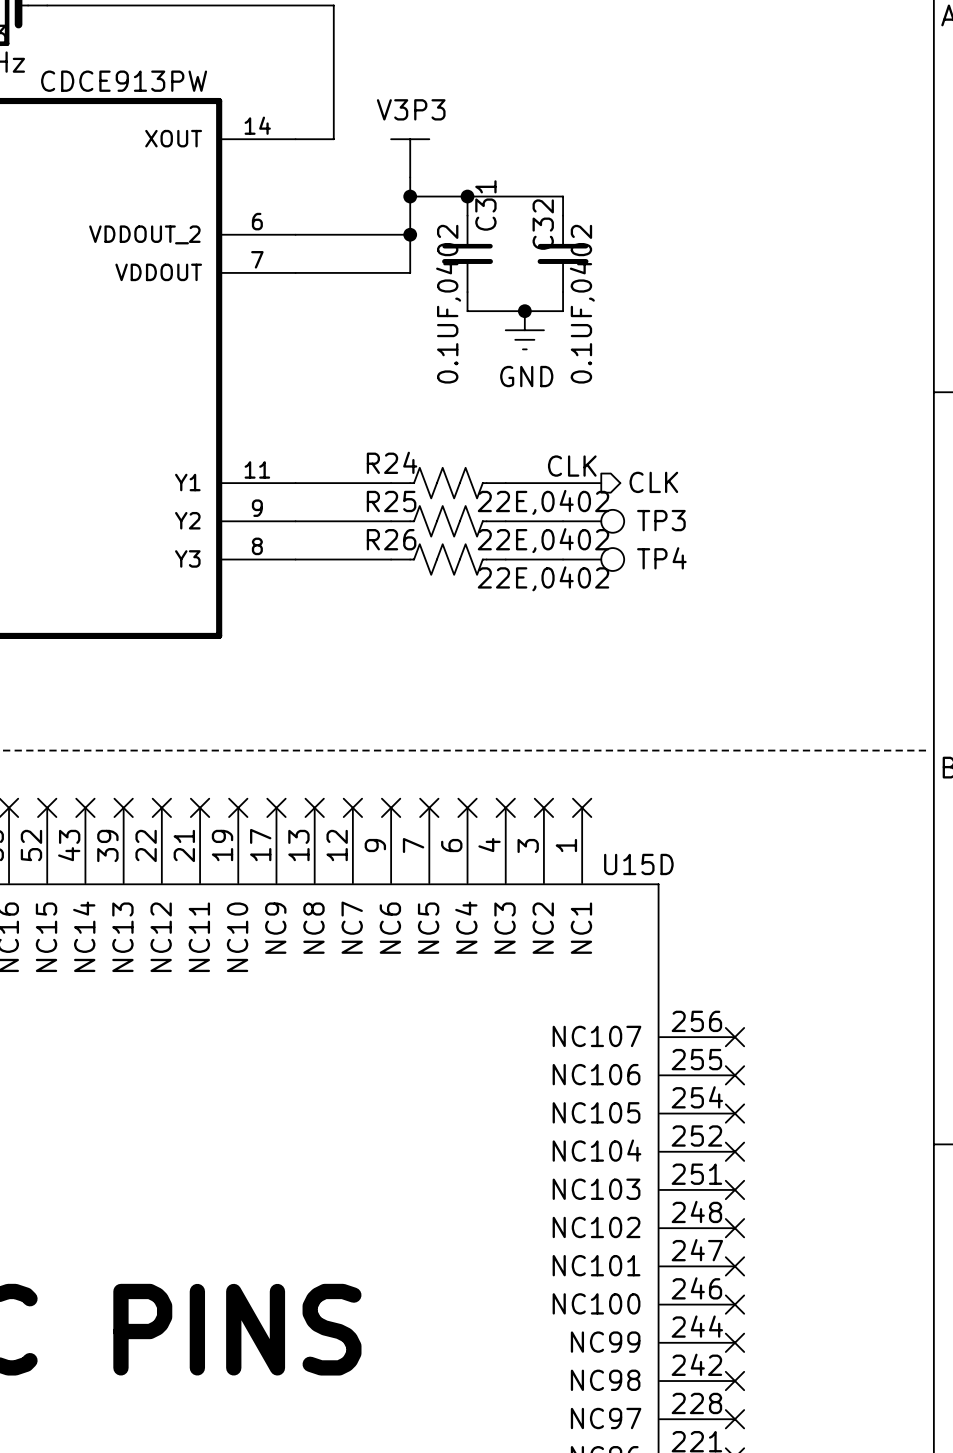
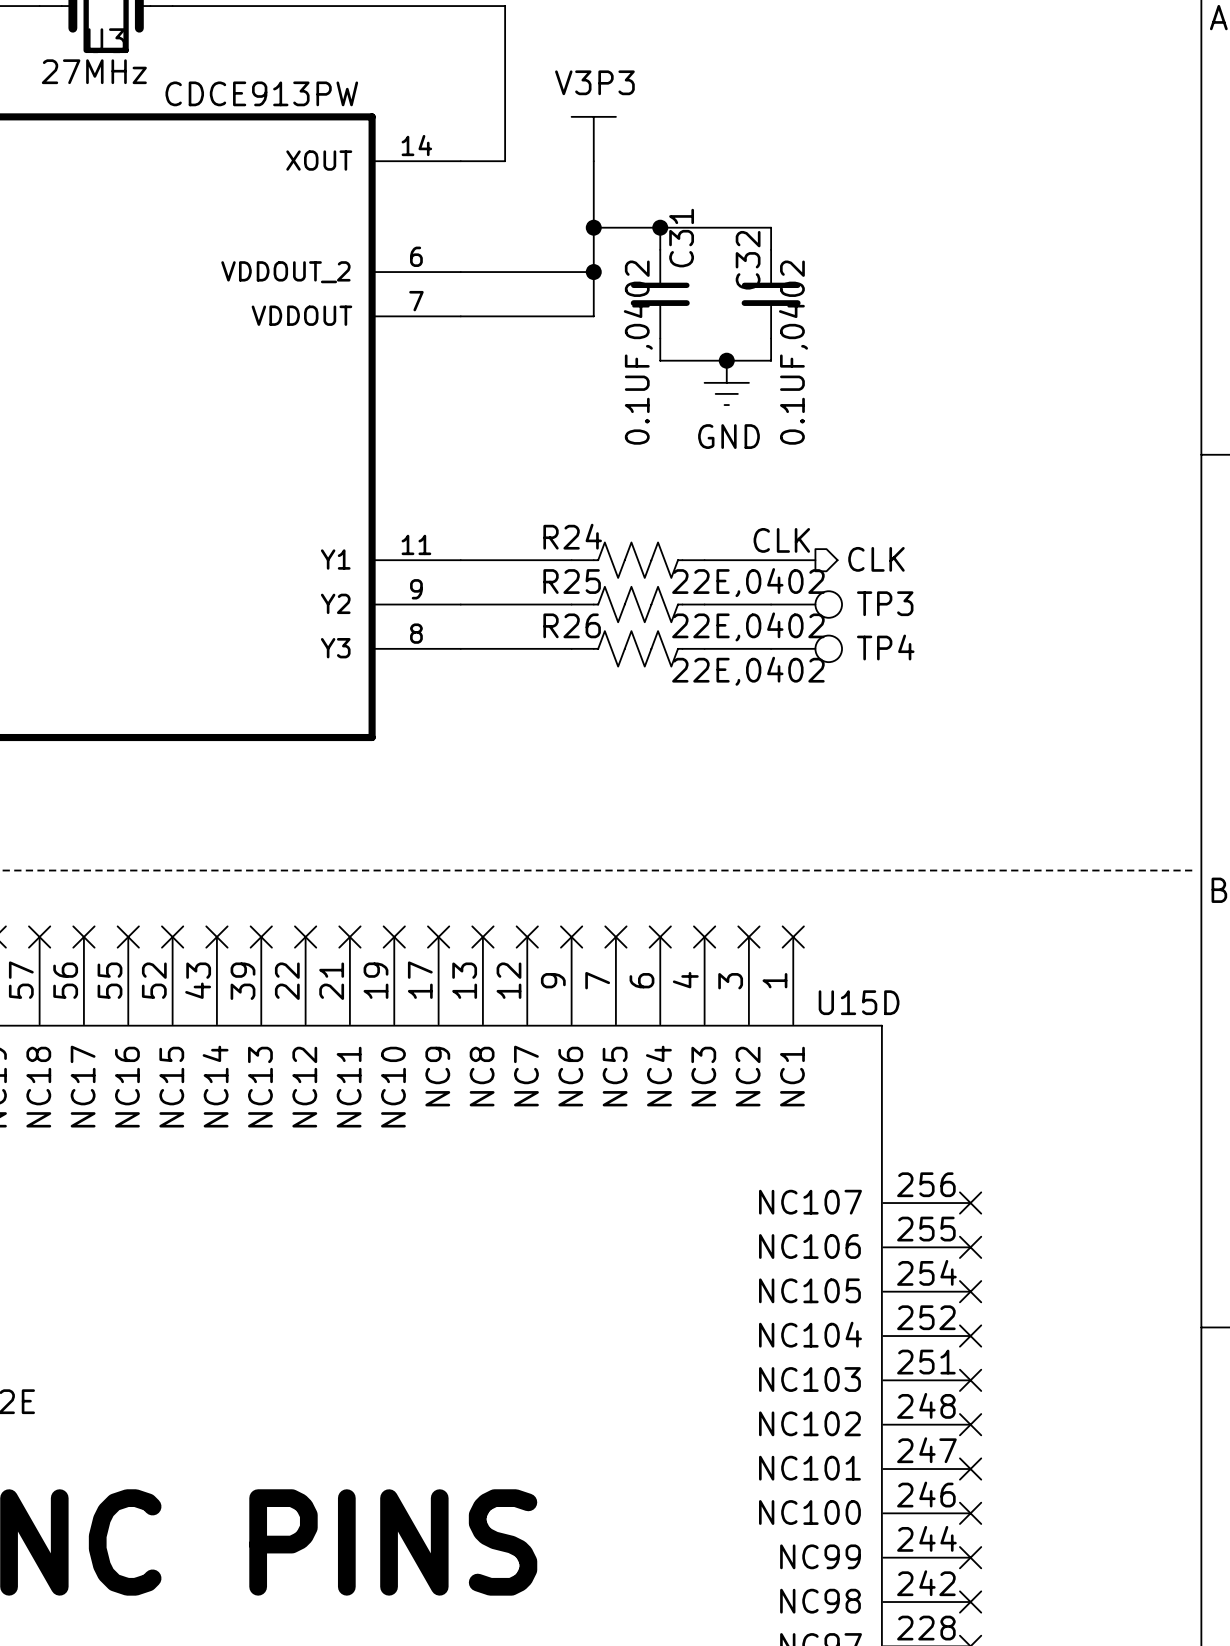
power symbol position: V3P3 (410, 158) -> V3P3 (593, 139)

